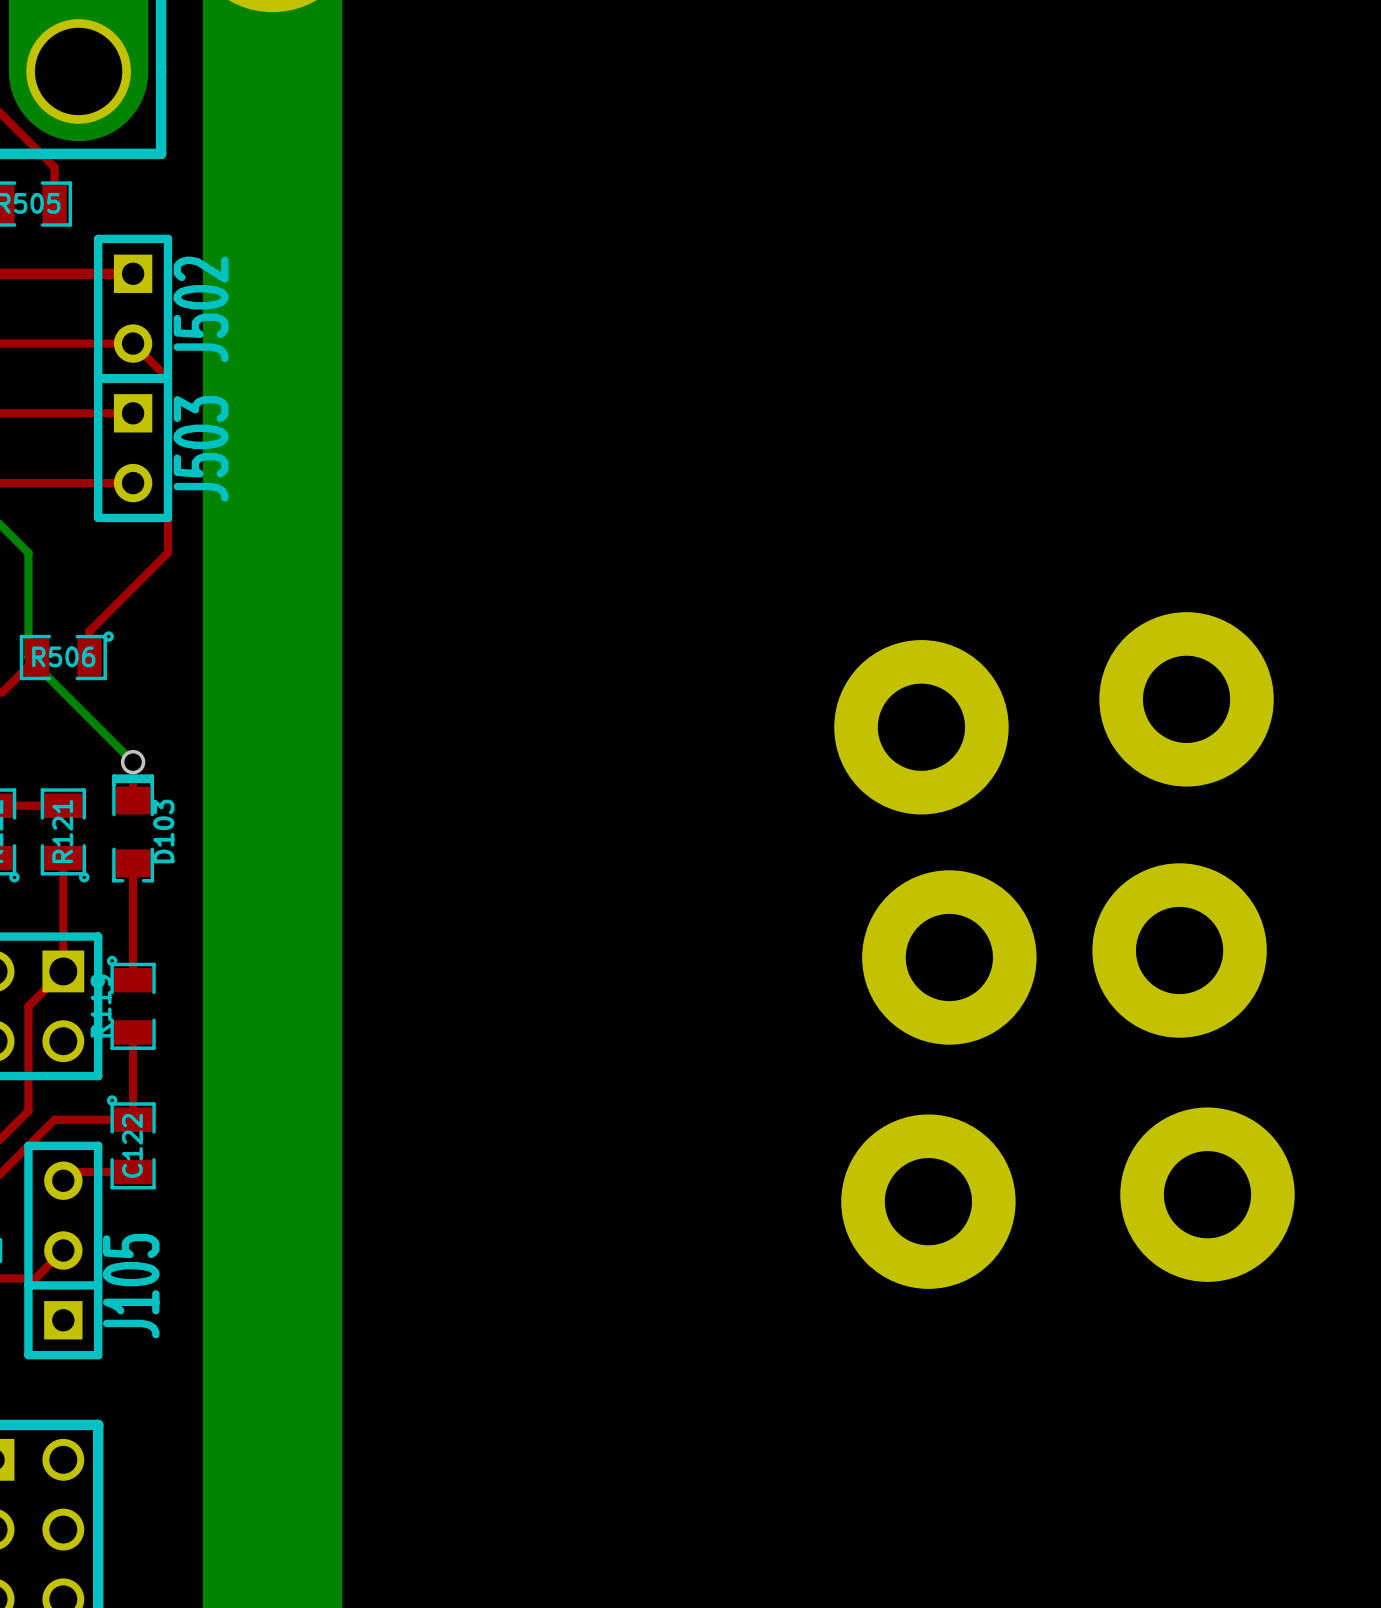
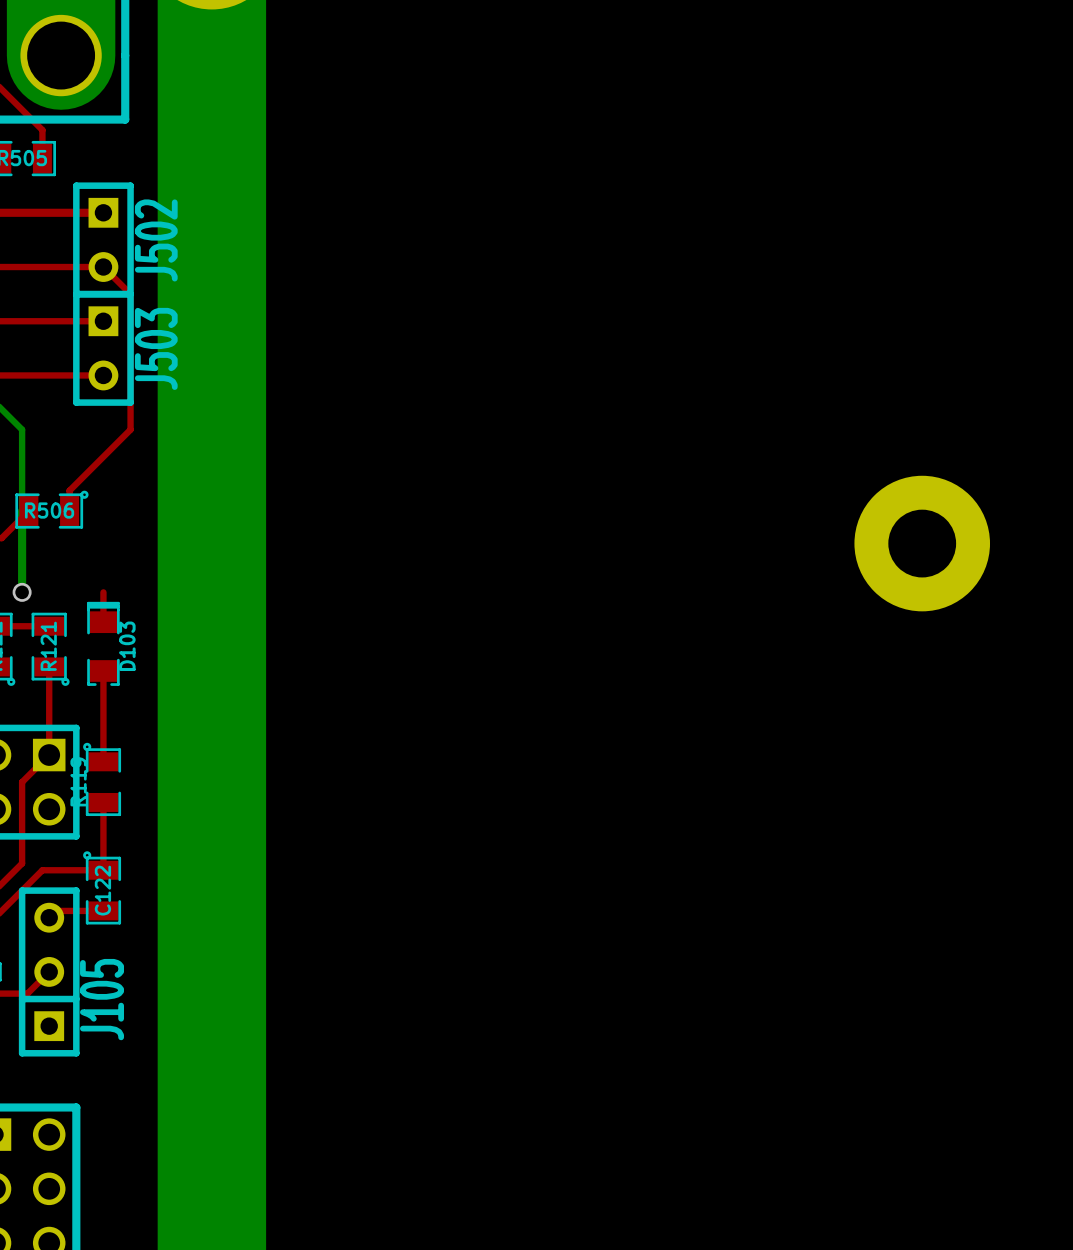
bottom track: (28, 657) (133, 762) -> (22, 511) (22, 592)
part: (921, 727) -> none
via position: (133, 762) -> (22, 592)
part: (1179, 950) -> none
part: (949, 957) -> none
part: (1207, 1194) -> none
part: (928, 1201) -> none

